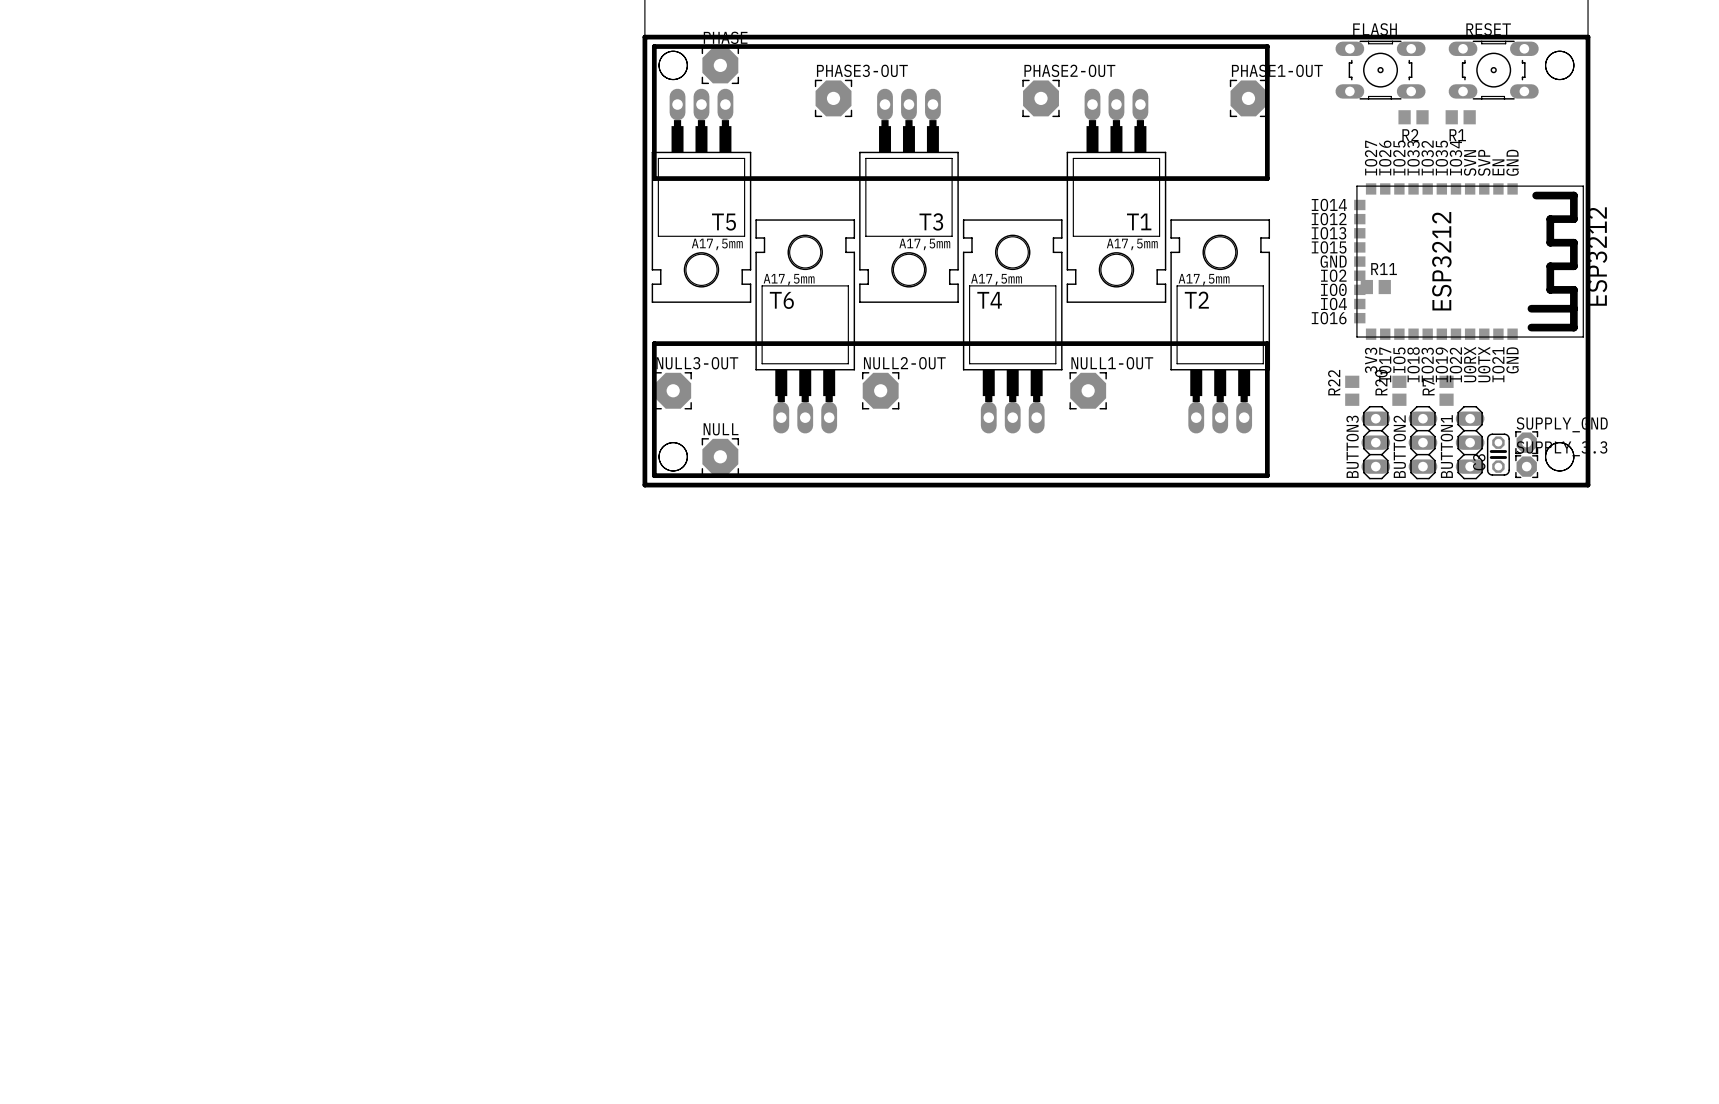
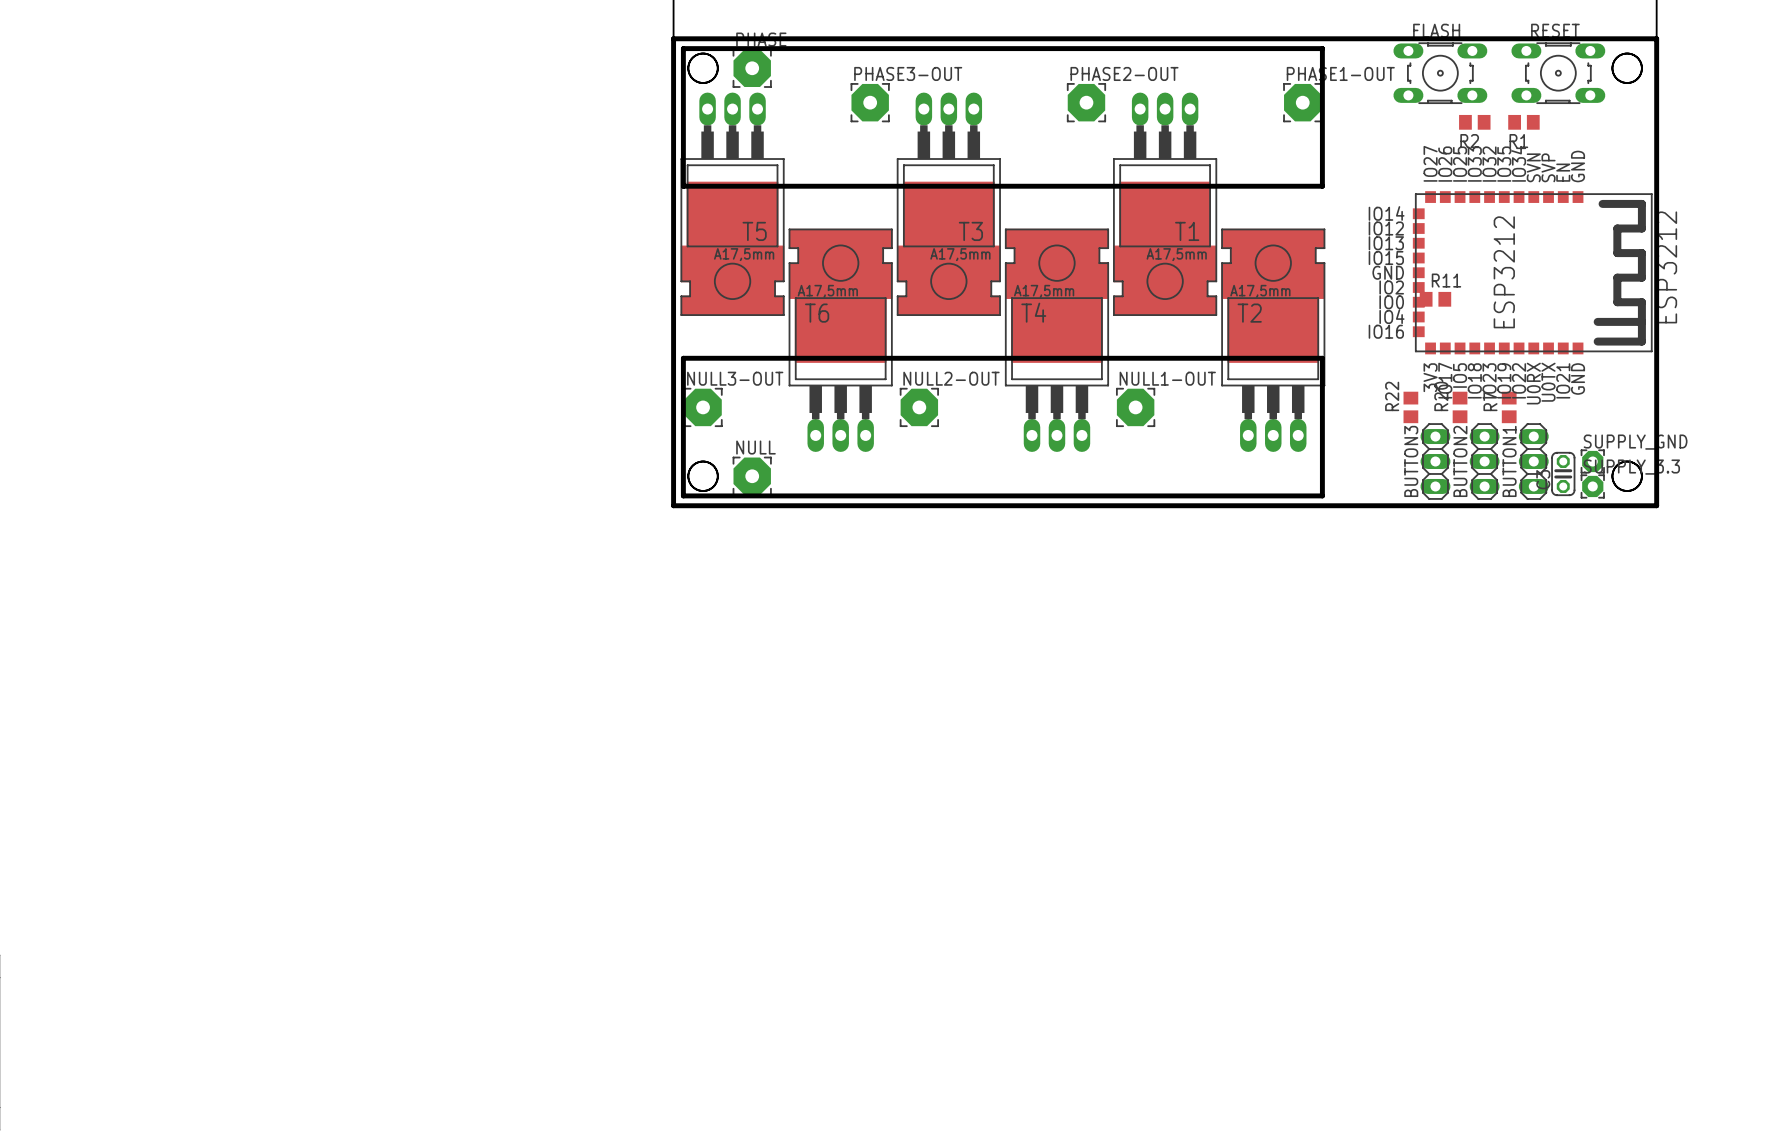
T5 footprint: [651, 88, 752, 303] -> [680, 92, 785, 316]
T3 footprint: [859, 88, 959, 303] -> [896, 92, 1001, 316]
T1 footprint: [1066, 88, 1167, 303] -> [1113, 92, 1218, 316]
T6 footprint: [755, 219, 856, 434] -> [788, 228, 893, 452]
T4 footprint: [962, 219, 1063, 434] -> [1005, 228, 1109, 452]
T2 footprint: [1170, 219, 1271, 434] -> [1221, 228, 1326, 452]

